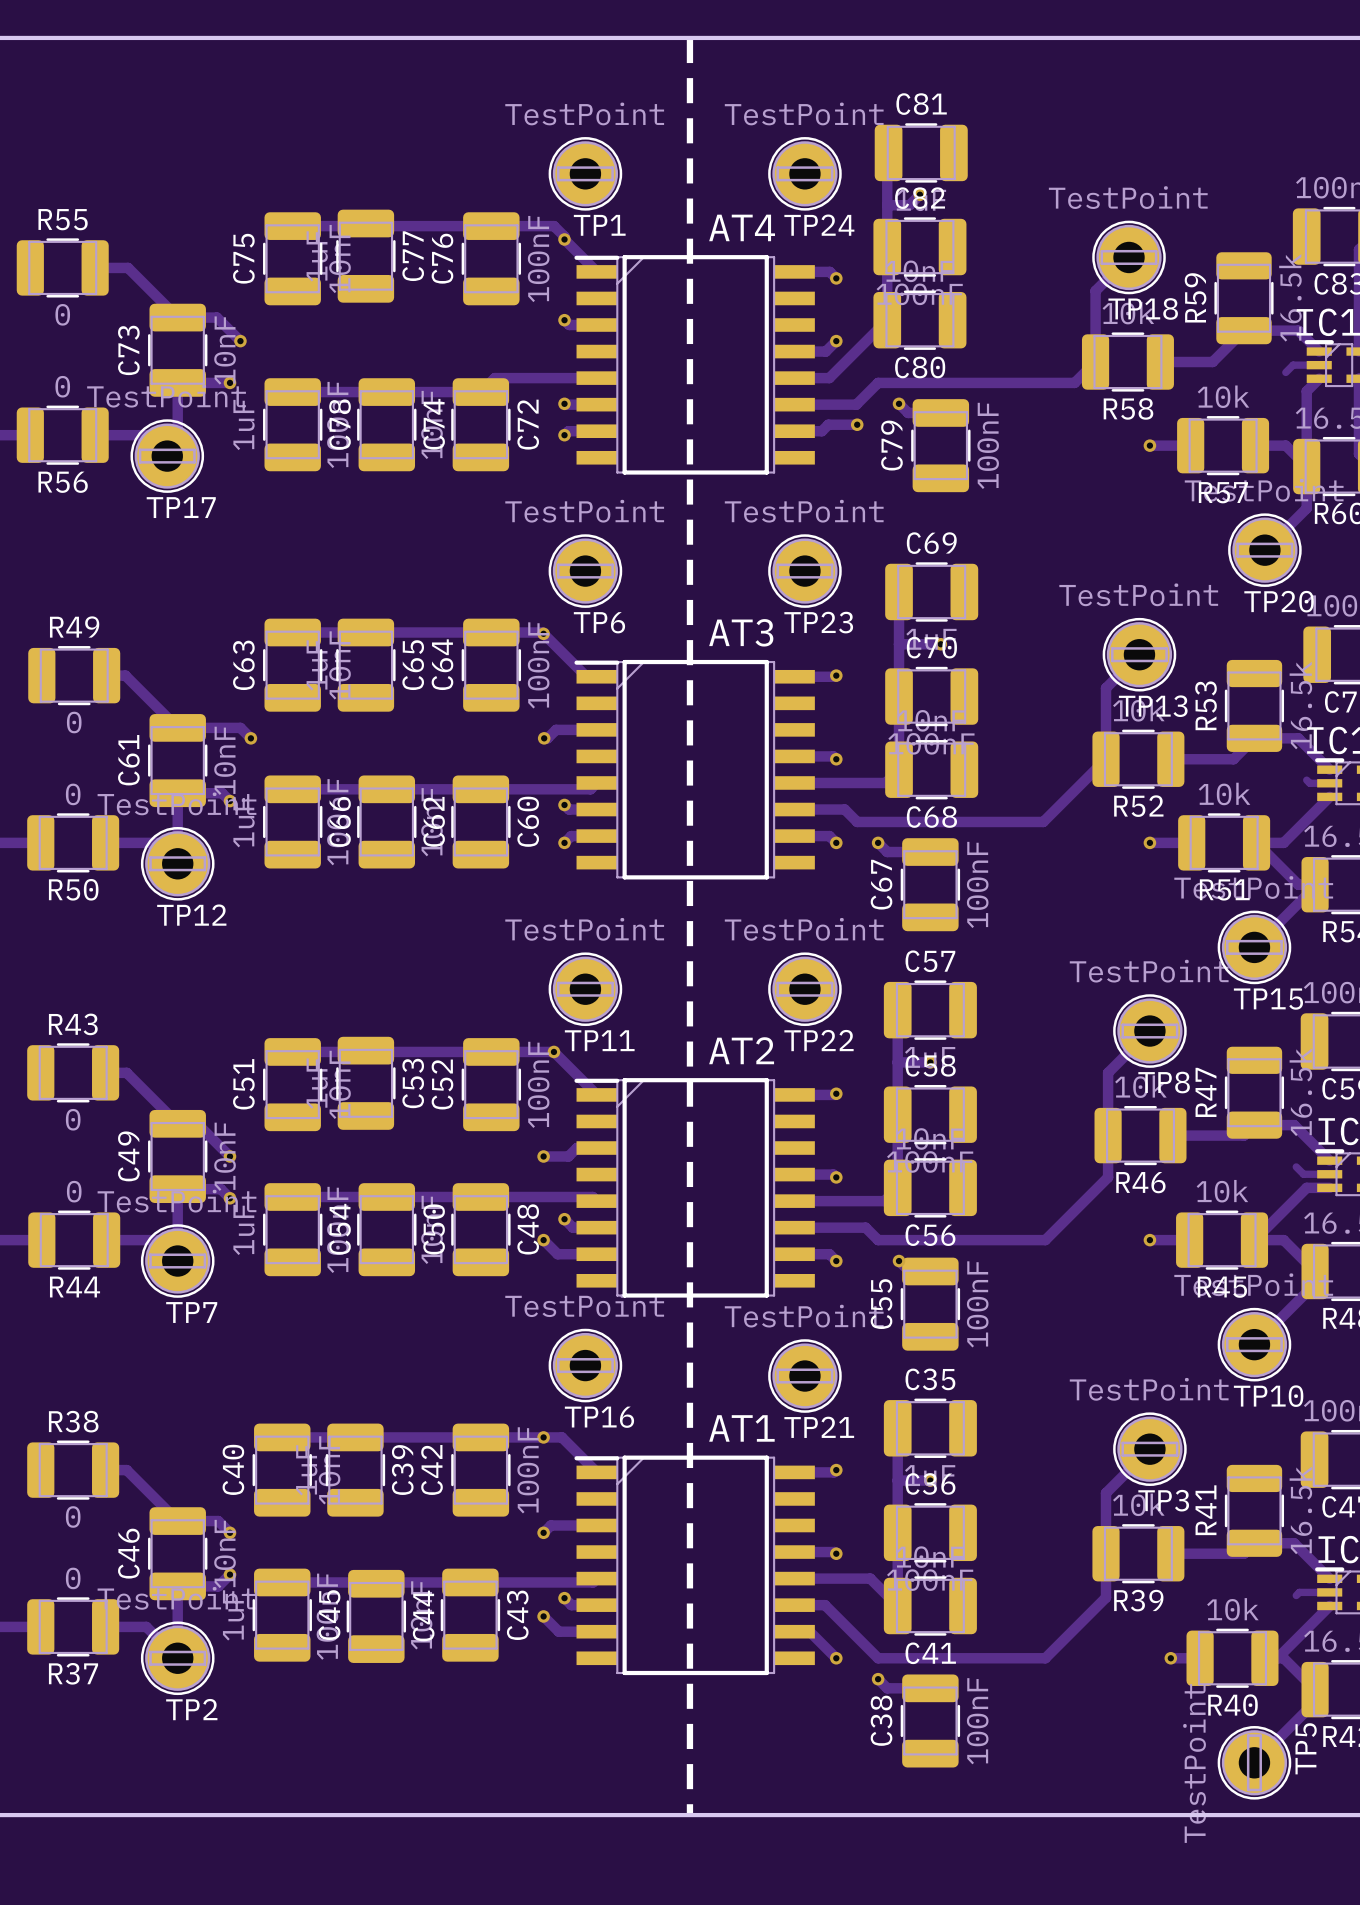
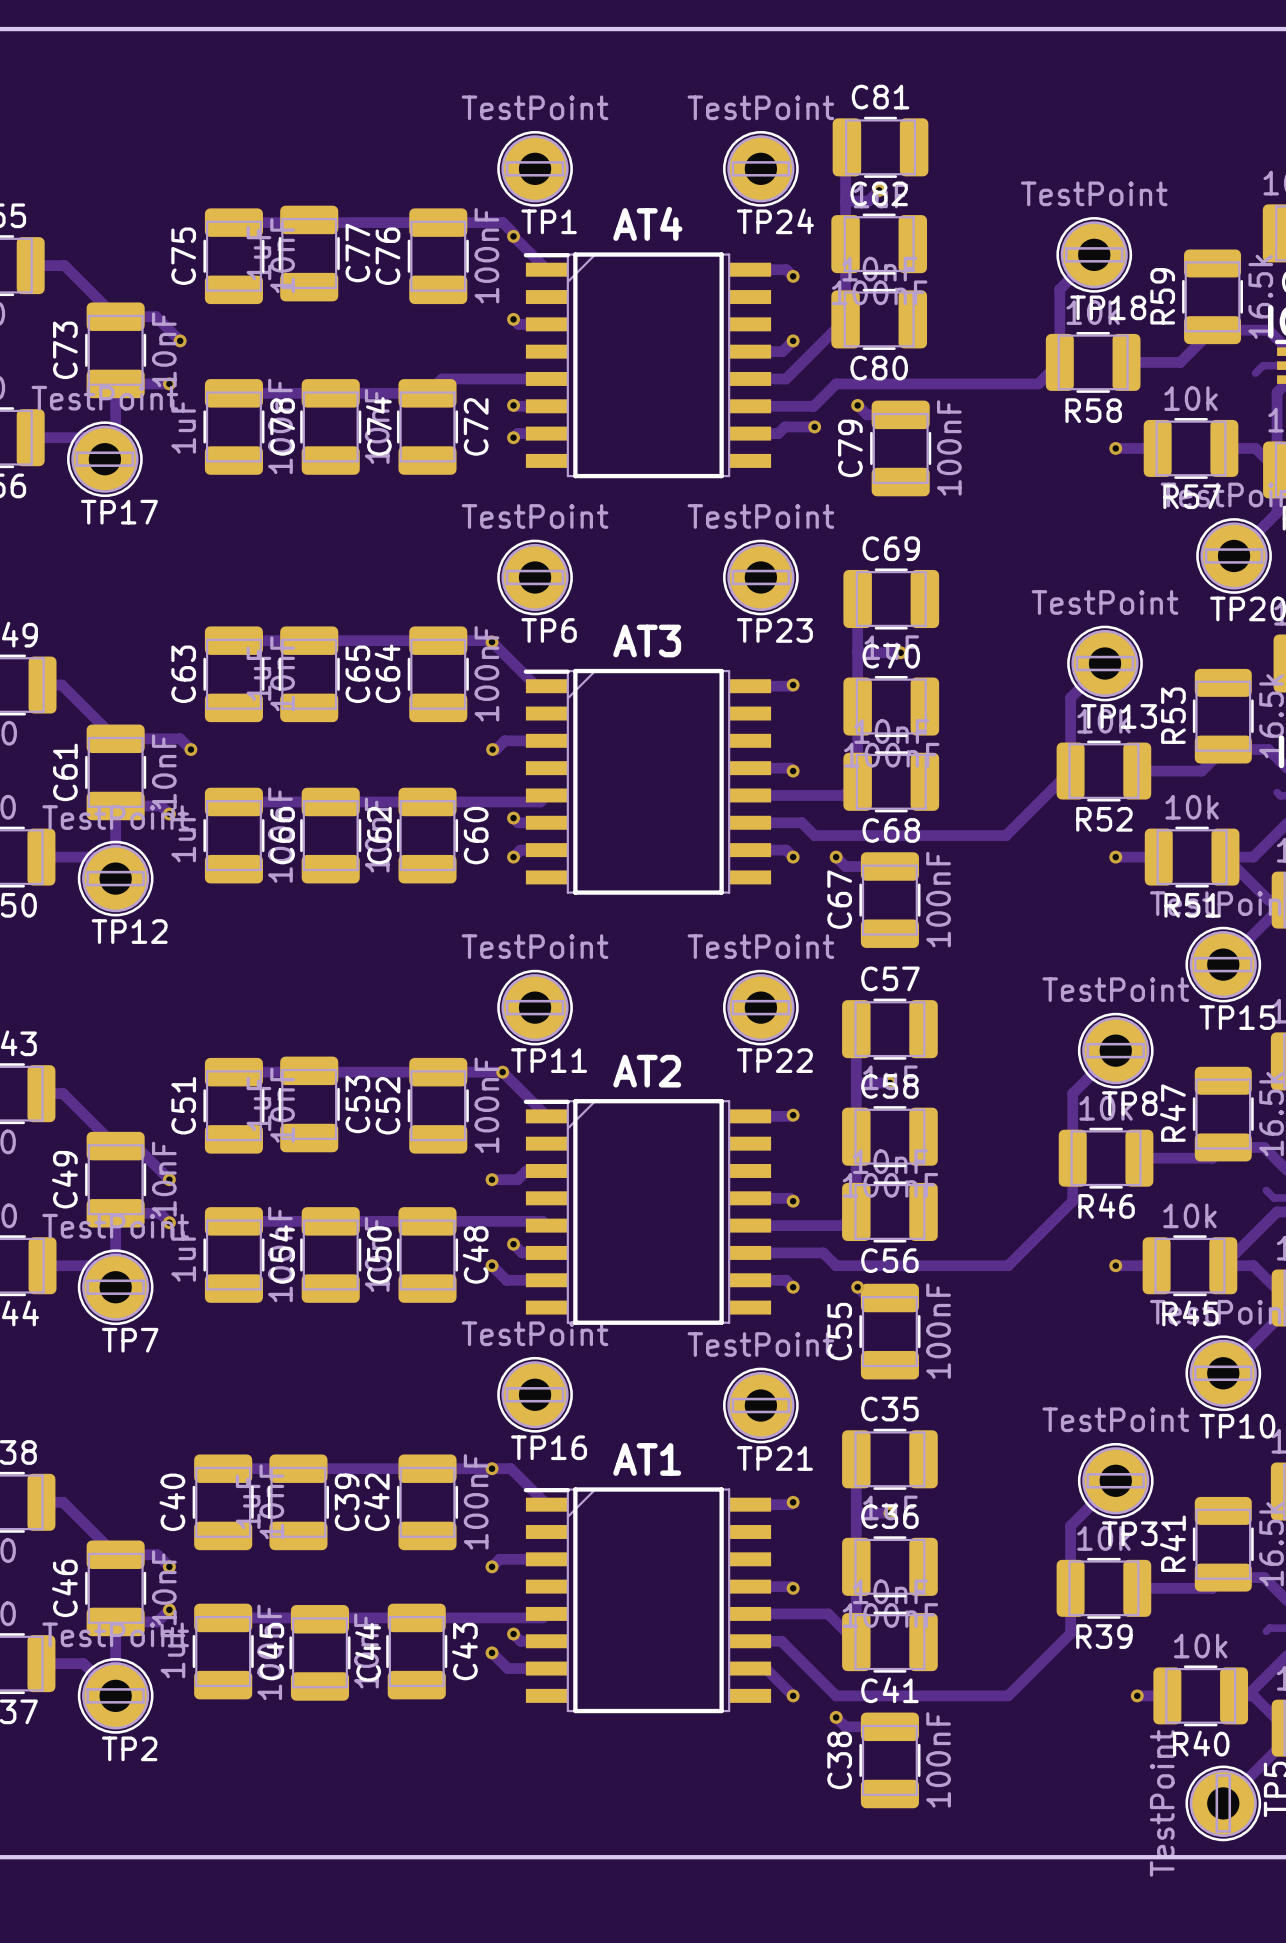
line: (689, 37) (689, 1815) -> none
AT4 name position: AT4 (742, 227) -> AT4 (647, 223)
AT3 name position: AT3 (741, 632) -> AT3 (647, 640)
AT2 name position: AT2 (741, 1050) -> AT2 (647, 1071)
AT1 name position: AT1 (741, 1428) -> AT1 (647, 1459)

